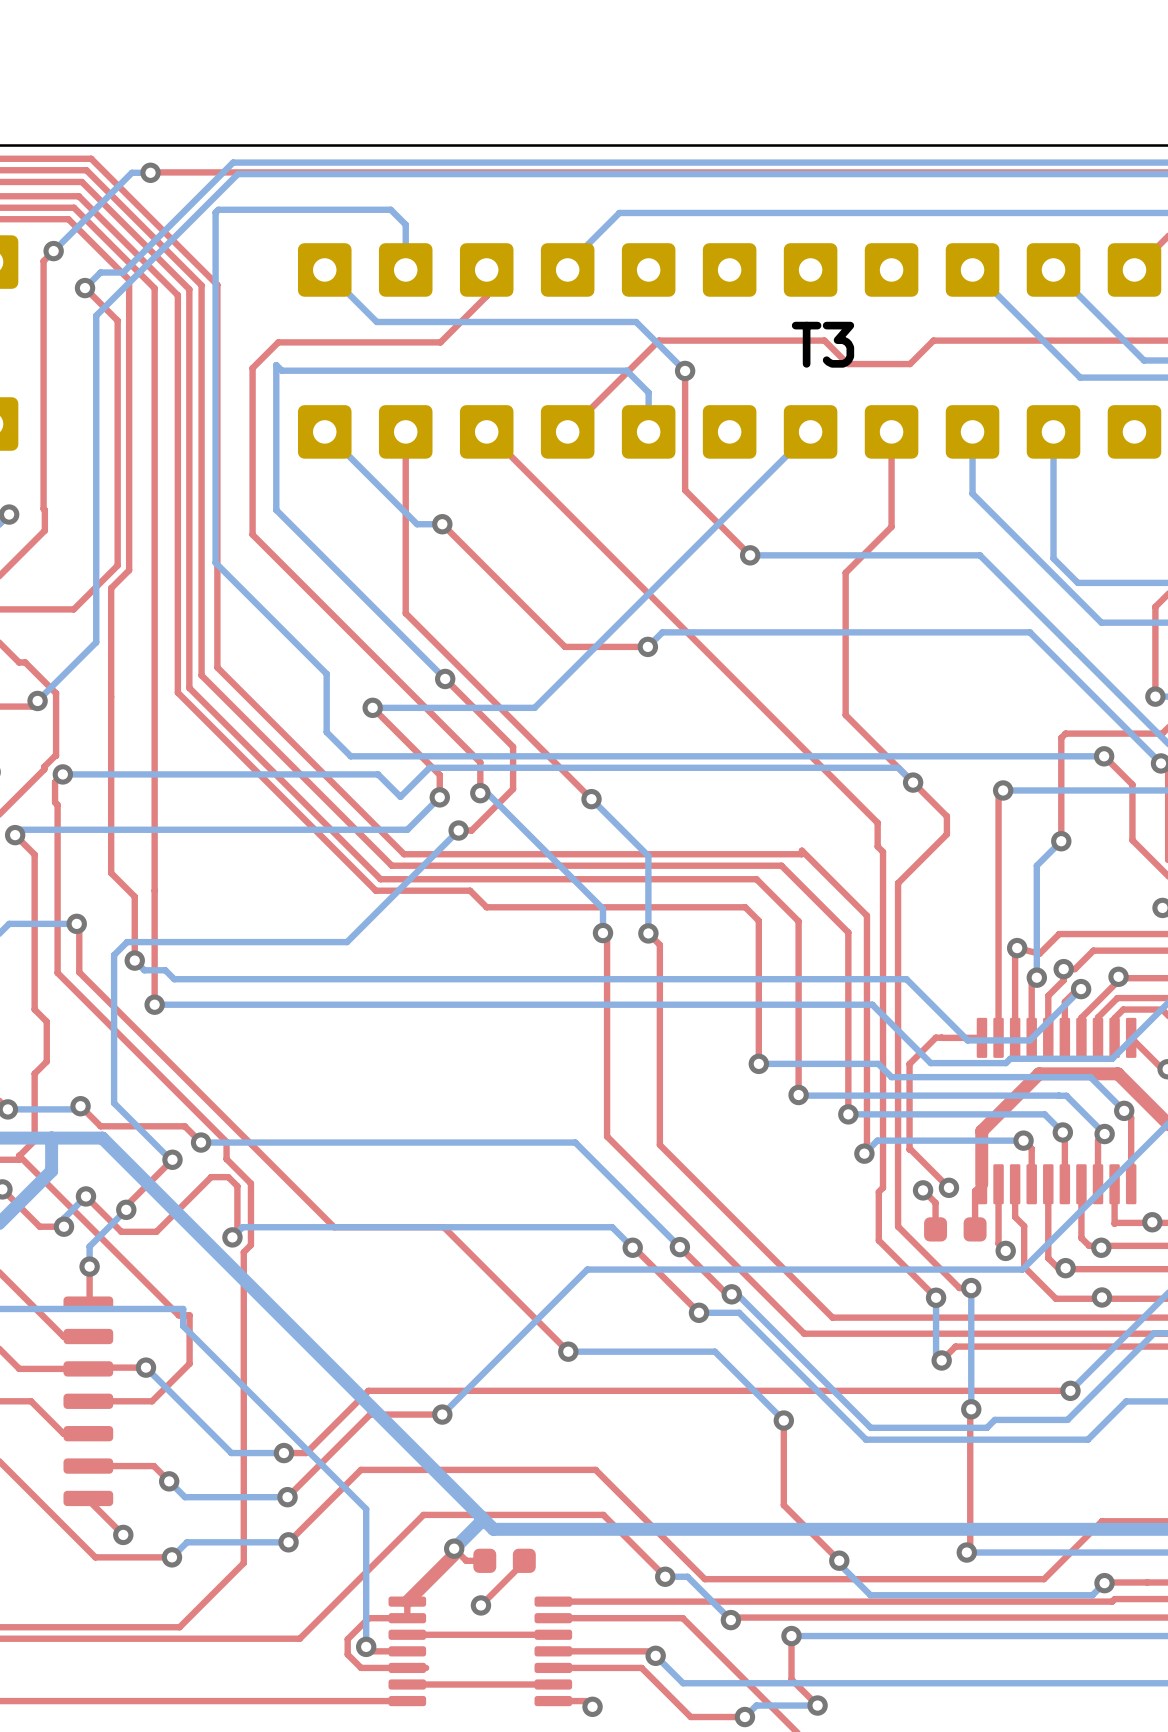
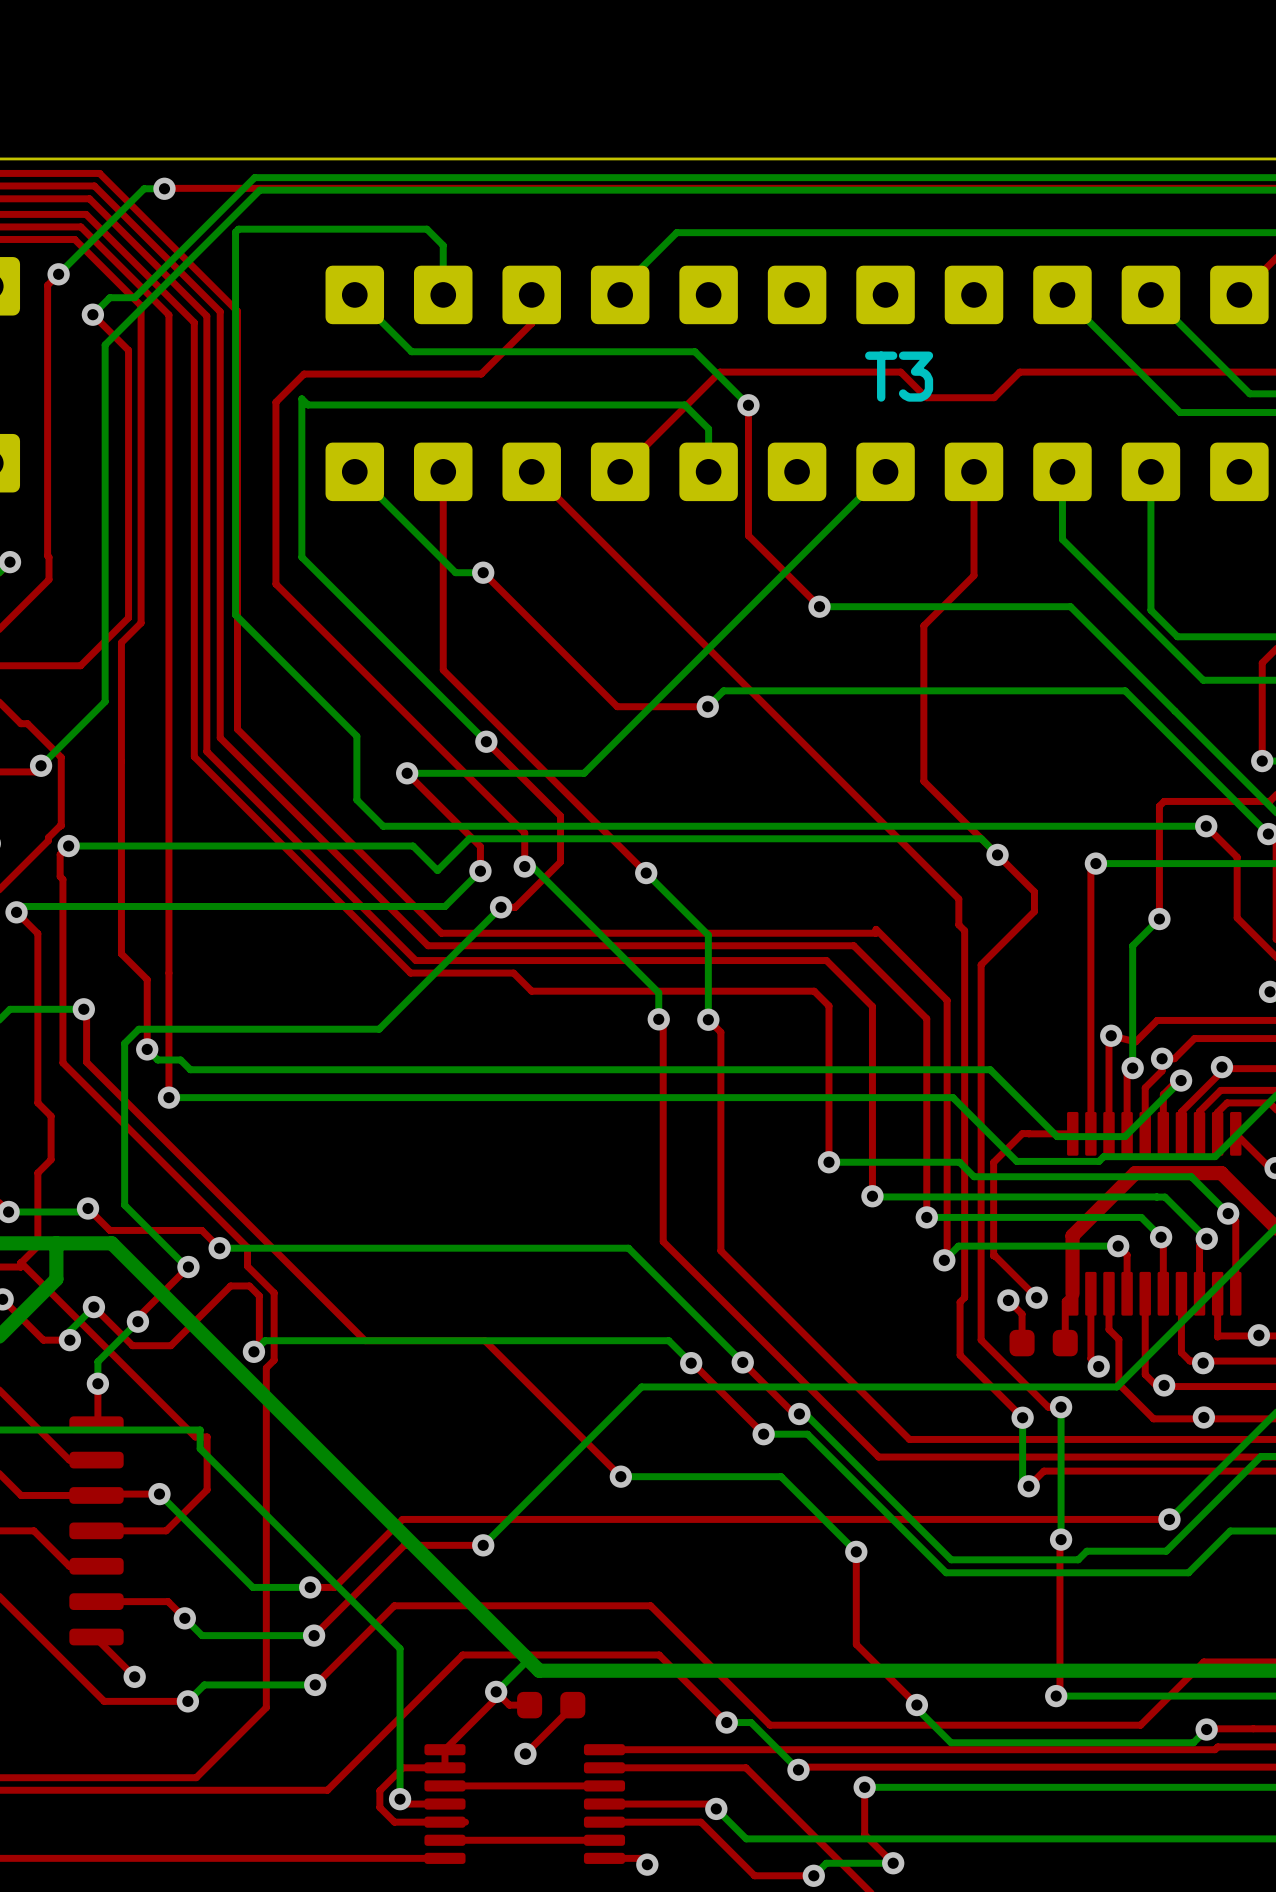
bottom track width: thick (481, 1521) (454, 1548) -> thin (525, 1662) (496, 1691)
top track width: thick (454, 1554) (407, 1601) -> thin (496, 1698) (444, 1749)

